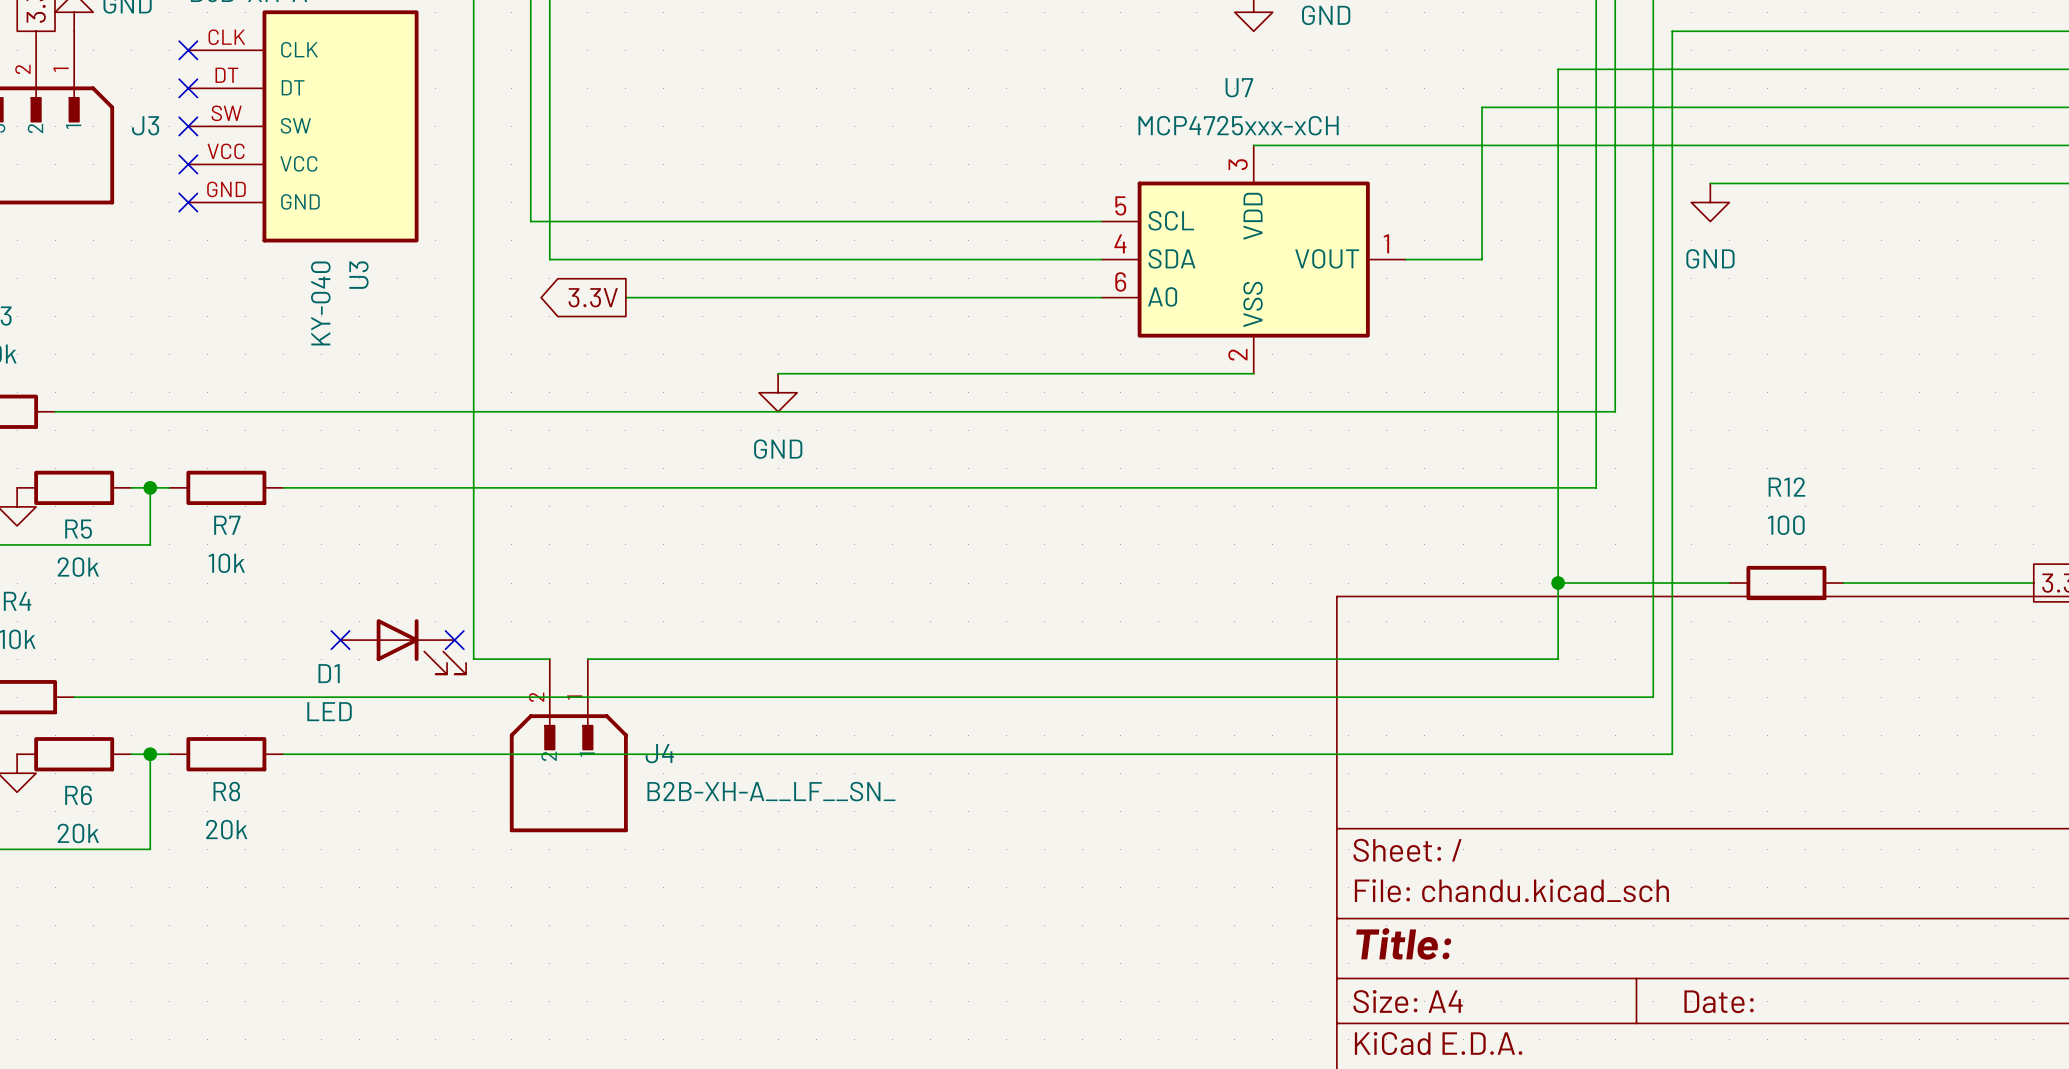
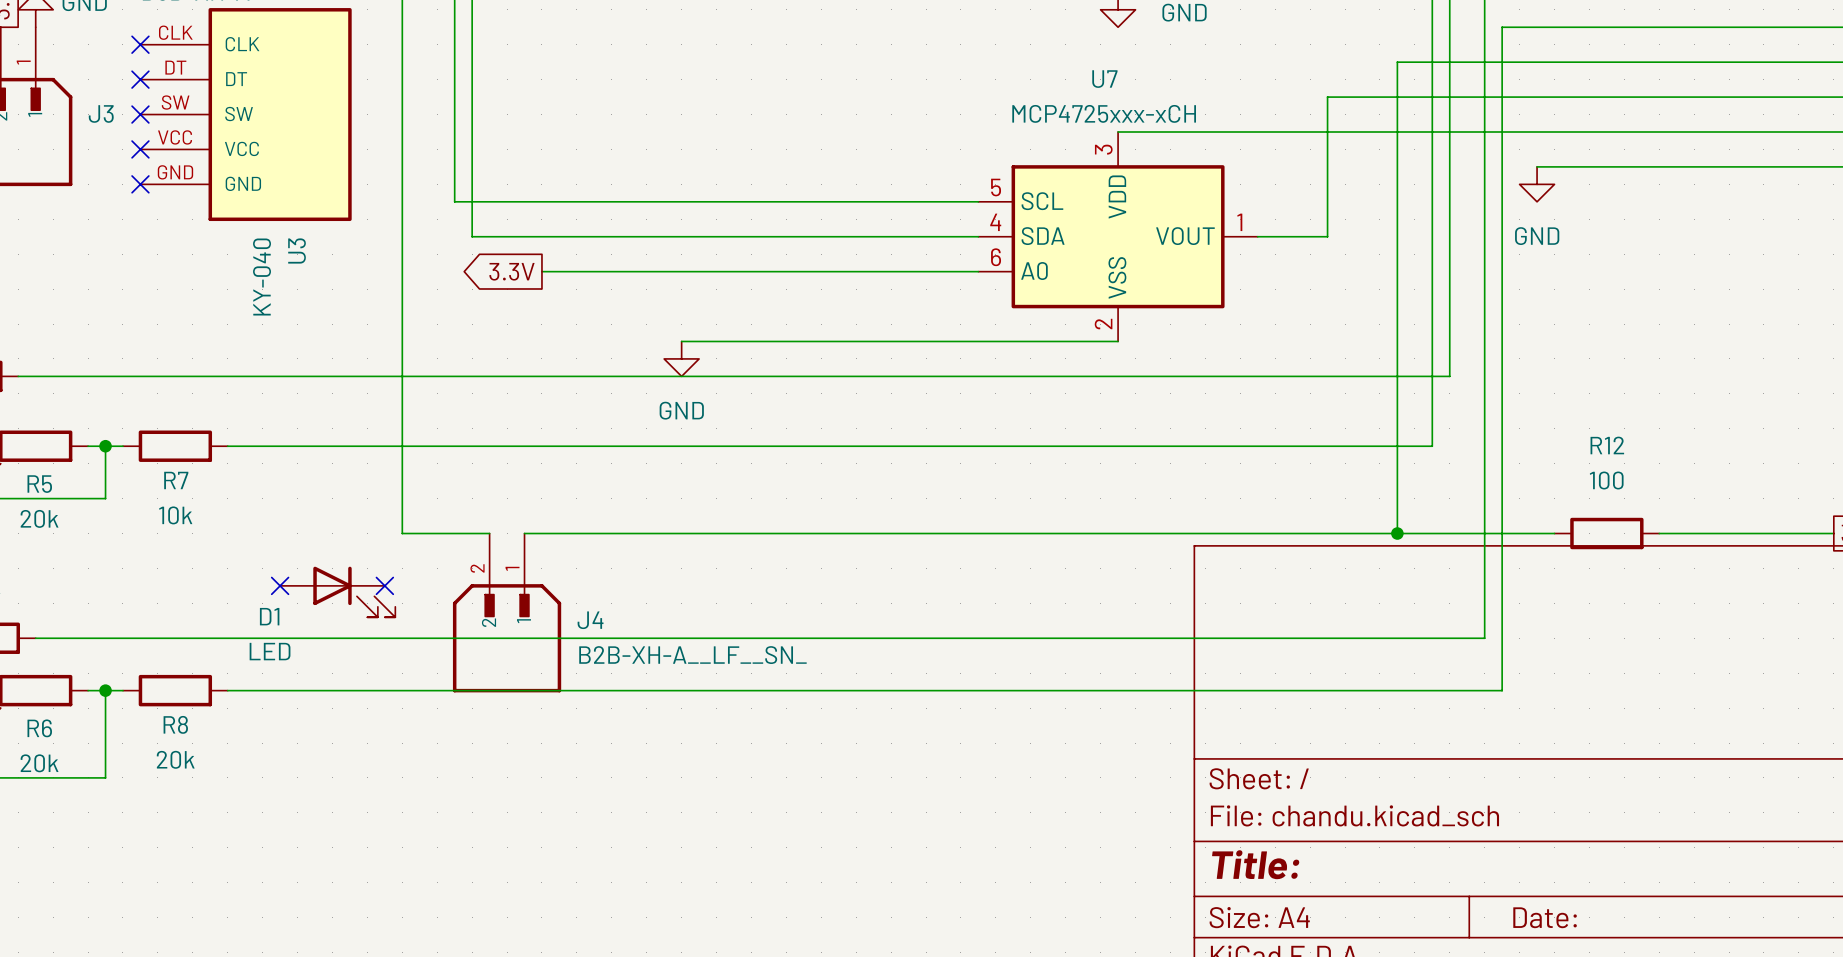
wire: (473, 583) (473, 659) (549, 659) -> (402, 533) (489, 533)
wire: (1558, 583) (1558, 659) (587, 659) -> (1397, 533) (524, 533)
J4 position: (568, 745) -> (507, 612)

